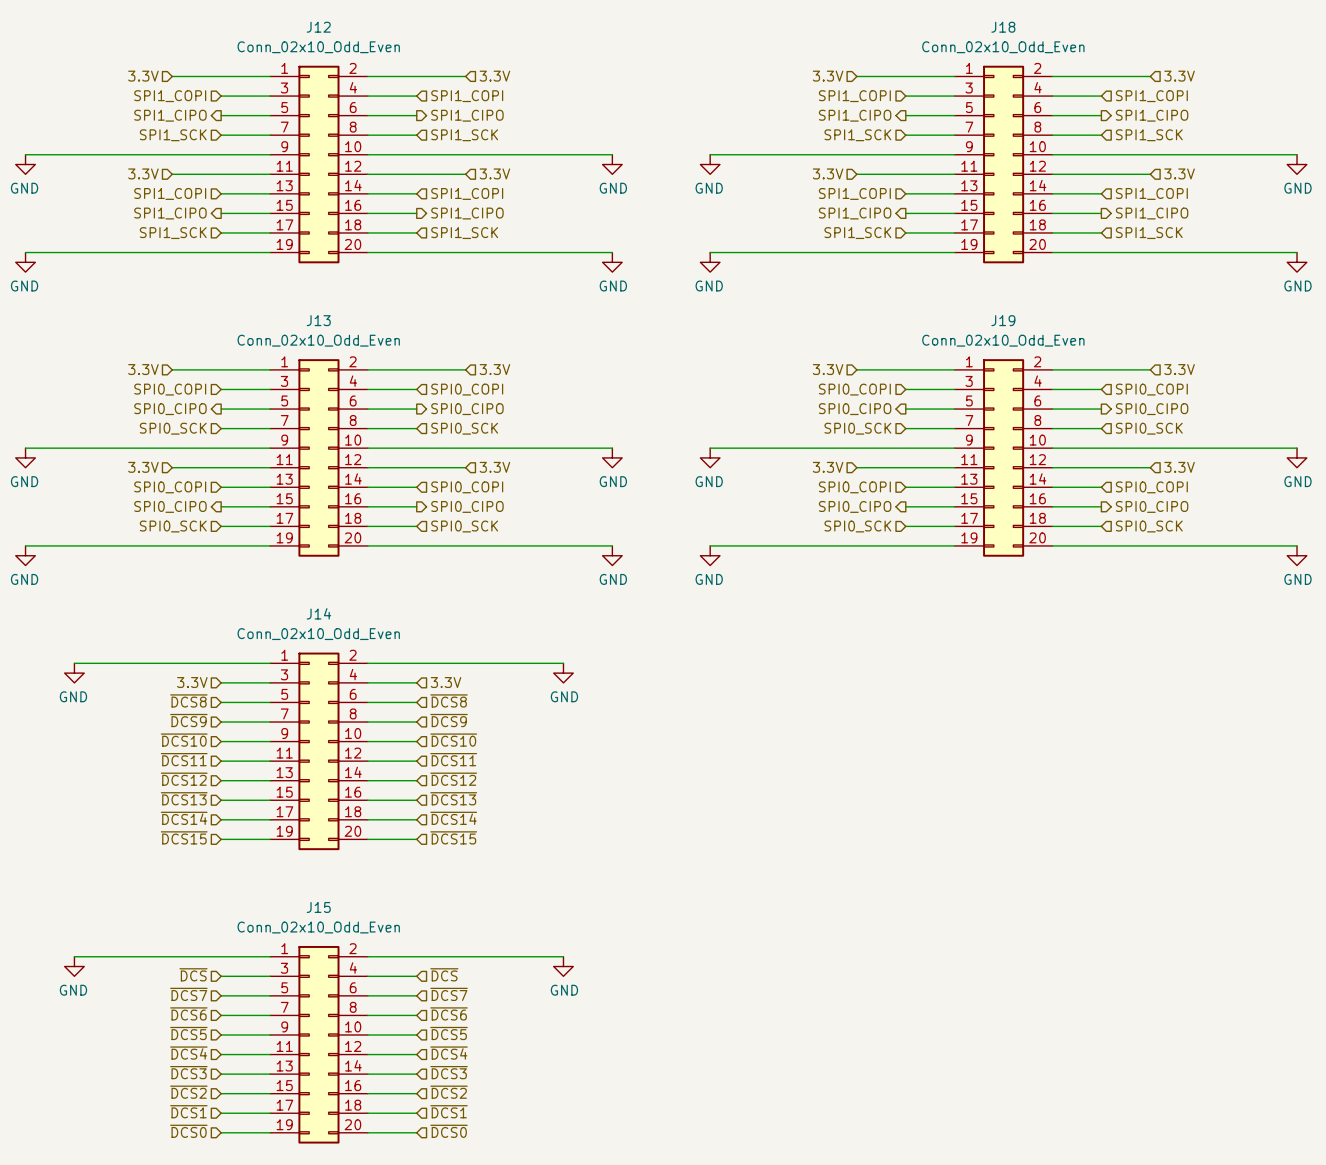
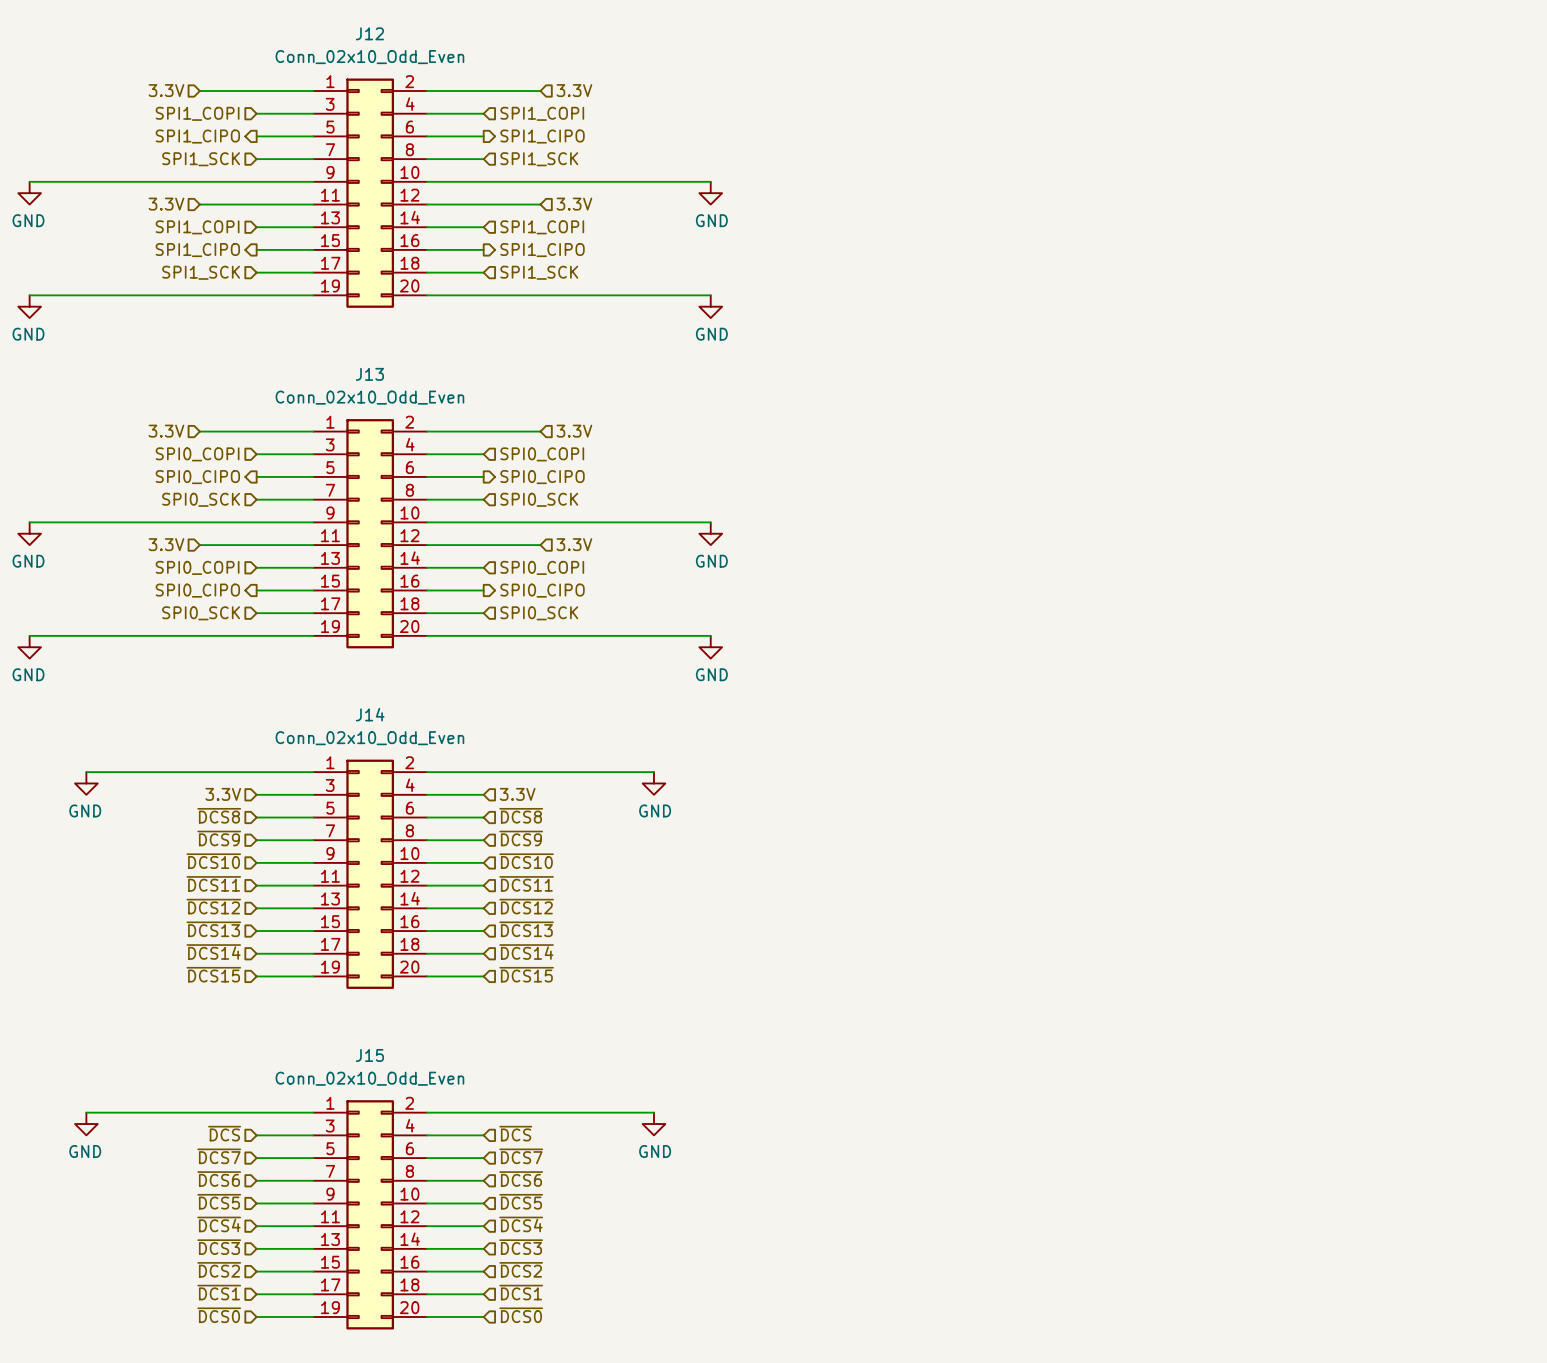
hierarchical label: 3.3V (828, 76) -> none
wire: (856, 76) (954, 76) -> none
wire: (1052, 76) (1150, 76) -> none
hierarchical label: 3.3V (1179, 76) -> none
hierarchical label: SPI1_COPI (854, 96) -> none
wire: (905, 96) (954, 96) -> none
wire: (1052, 96) (1101, 96) -> none
hierarchical label: SPI1_COPI (1151, 96) -> none
hierarchical label: SPI1_CIPO (855, 115) -> none
wire: (905, 115) (954, 115) -> none
wire: (1052, 115) (1101, 115) -> none
hierarchical label: SPI1_CIPO (1152, 115) -> none
hierarchical label: SPI1_SCK (857, 135) -> none
wire: (905, 135) (954, 135) -> none
wire: (1052, 135) (1101, 135) -> none
hierarchical label: SPI1_SCK (1149, 135) -> none
wire: (710, 154) (954, 154) -> none
wire: (1052, 154) (1297, 154) -> none
power symbol: GND (710, 164) -> none
J18: Conn_02x10_Odd_Even (1003, 164) -> none
power symbol: GND (1297, 164) -> none
hierarchical label: 3.3V (828, 173) -> none
hierarchical label: 3.3V (1179, 173) -> none
wire: (856, 174) (954, 174) -> none
wire: (1052, 174) (1150, 174) -> none
hierarchical label: SPI1_COPI (854, 193) -> none
wire: (905, 193) (954, 193) -> none
wire: (1052, 193) (1101, 193) -> none
hierarchical label: SPI1_COPI (1151, 193) -> none
hierarchical label: SPI1_CIPO (855, 213) -> none
wire: (905, 213) (954, 213) -> none
wire: (1052, 213) (1101, 213) -> none
hierarchical label: SPI1_CIPO (1152, 213) -> none
wire: (905, 232) (954, 232) -> none
wire: (1052, 232) (1101, 232) -> none
hierarchical label: SPI1_SCK (857, 233) -> none
hierarchical label: SPI1_SCK (1149, 233) -> none
wire: (710, 252) (954, 252) -> none
wire: (1052, 252) (1297, 252) -> none
power symbol: GND (710, 262) -> none
power symbol: GND (1297, 262) -> none
hierarchical label: 3.3V (828, 369) -> none
wire: (856, 369) (954, 369) -> none
wire: (1052, 369) (1150, 369) -> none
hierarchical label: 3.3V (1179, 369) -> none
hierarchical label: SPI0_COPI (854, 389) -> none
wire: (905, 389) (954, 389) -> none
wire: (1052, 389) (1101, 389) -> none
hierarchical label: SPI0_COPI (1151, 389) -> none
hierarchical label: SPI0_CIPO (855, 409) -> none
wire: (905, 409) (954, 409) -> none
wire: (1052, 409) (1101, 409) -> none
hierarchical label: SPI0_CIPO (1152, 409) -> none
hierarchical label: SPI0_SCK (857, 428) -> none
wire: (905, 428) (954, 428) -> none
wire: (1052, 428) (1101, 428) -> none
hierarchical label: SPI0_SCK (1149, 428) -> none
wire: (710, 448) (954, 448) -> none
wire: (1052, 448) (1297, 448) -> none
power symbol: GND (710, 457) -> none
J19: Conn_02x10_Odd_Even (1003, 457) -> none
power symbol: GND (1297, 457) -> none
hierarchical label: 3.3V (828, 467) -> none
wire: (856, 467) (954, 467) -> none
wire: (1052, 467) (1150, 467) -> none
hierarchical label: 3.3V (1179, 467) -> none
hierarchical label: SPI0_COPI (854, 487) -> none
wire: (905, 487) (954, 487) -> none
wire: (1052, 487) (1101, 487) -> none
hierarchical label: SPI0_COPI (1151, 487) -> none
hierarchical label: SPI0_CIPO (855, 506) -> none
wire: (905, 506) (954, 506) -> none
wire: (1052, 506) (1101, 506) -> none
hierarchical label: SPI0_CIPO (1152, 506) -> none
hierarchical label: SPI0_SCK (857, 526) -> none
wire: (905, 526) (954, 526) -> none
wire: (1052, 526) (1101, 526) -> none
hierarchical label: SPI0_SCK (1149, 526) -> none
wire: (710, 545) (954, 545) -> none
wire: (1052, 545) (1297, 545) -> none
power symbol: GND (710, 555) -> none
power symbol: GND (1297, 555) -> none

